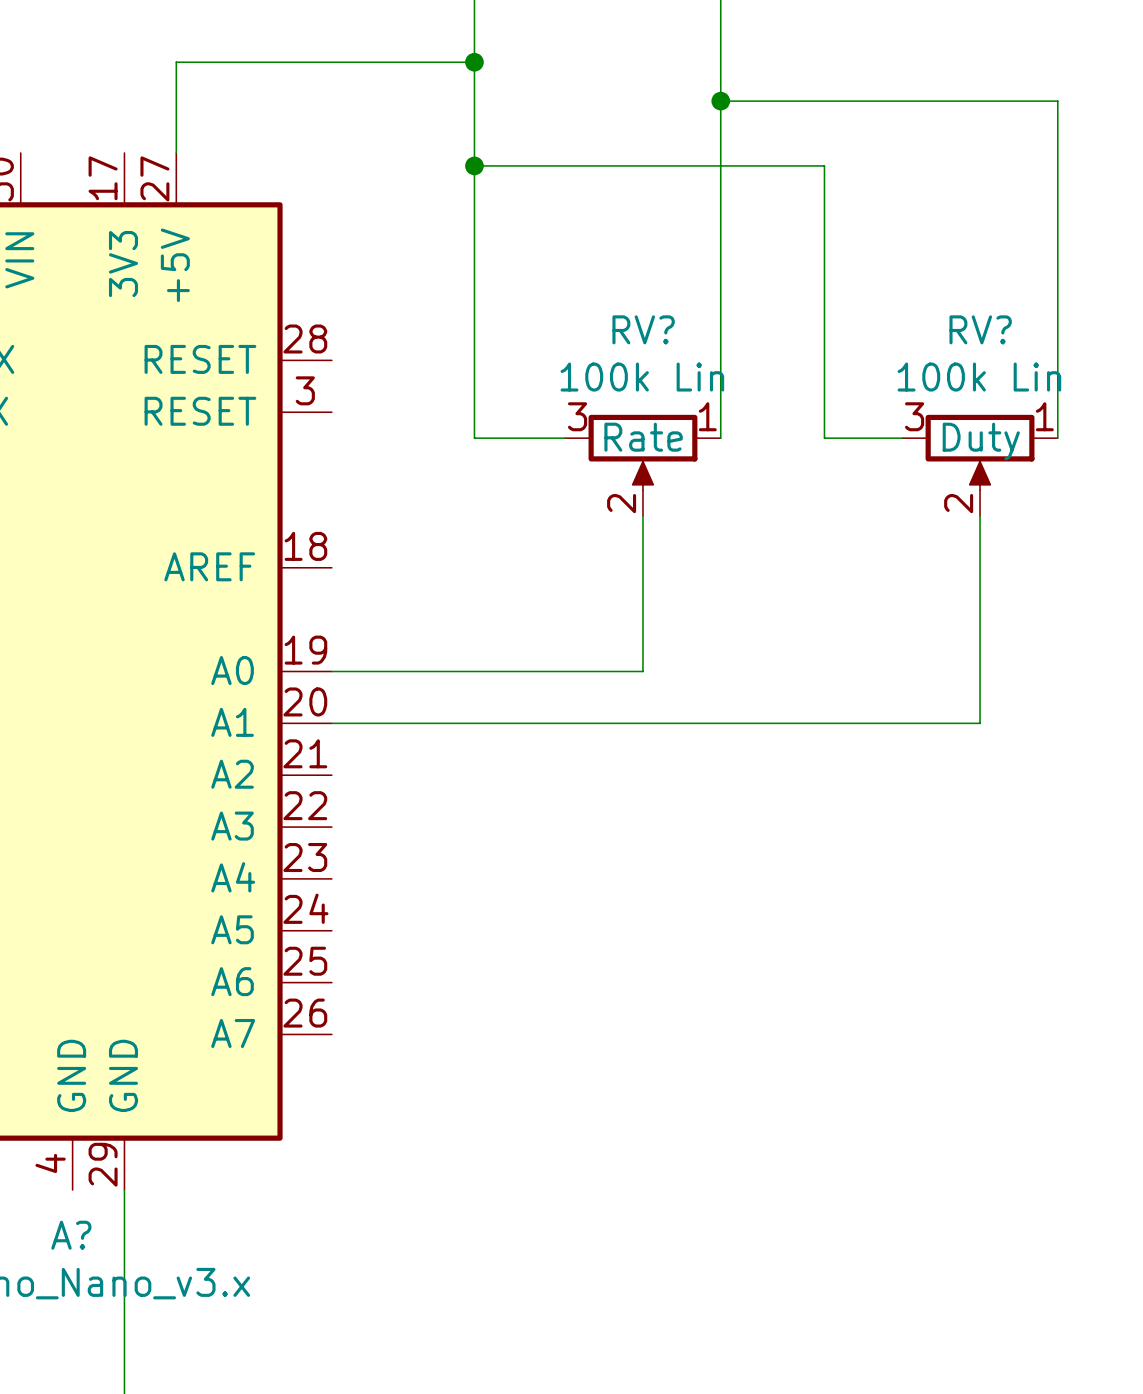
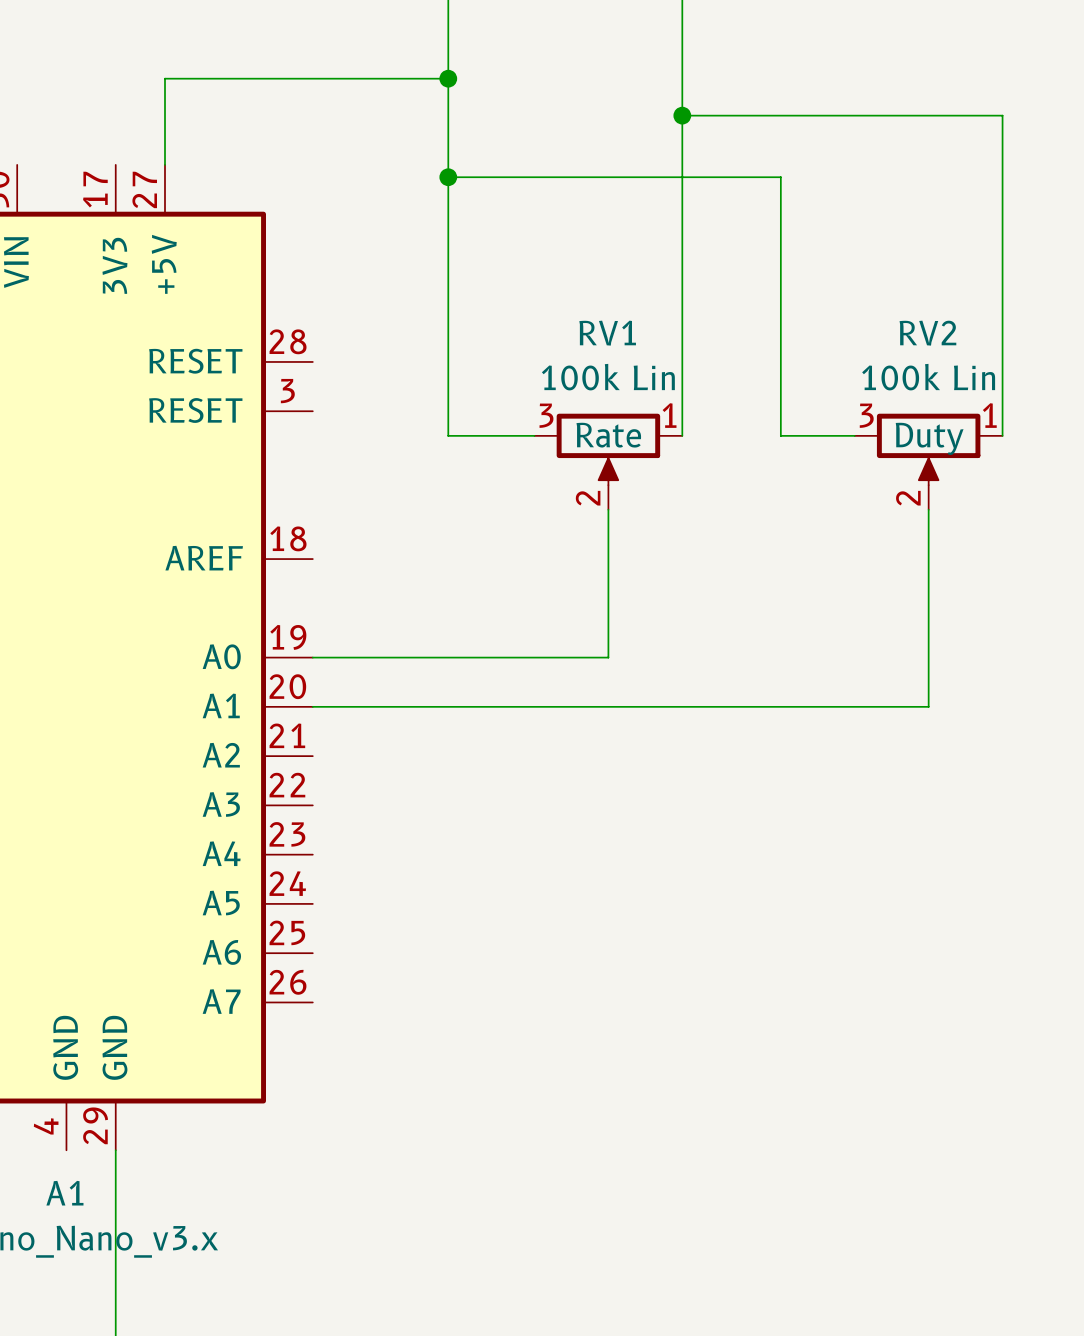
RV? name: RV? (643, 329) -> RV1 (607, 333)
RV? name: RV? (980, 329) -> RV2 (927, 333)
A? name: A? (71, 1235) -> A1 (64, 1193)

